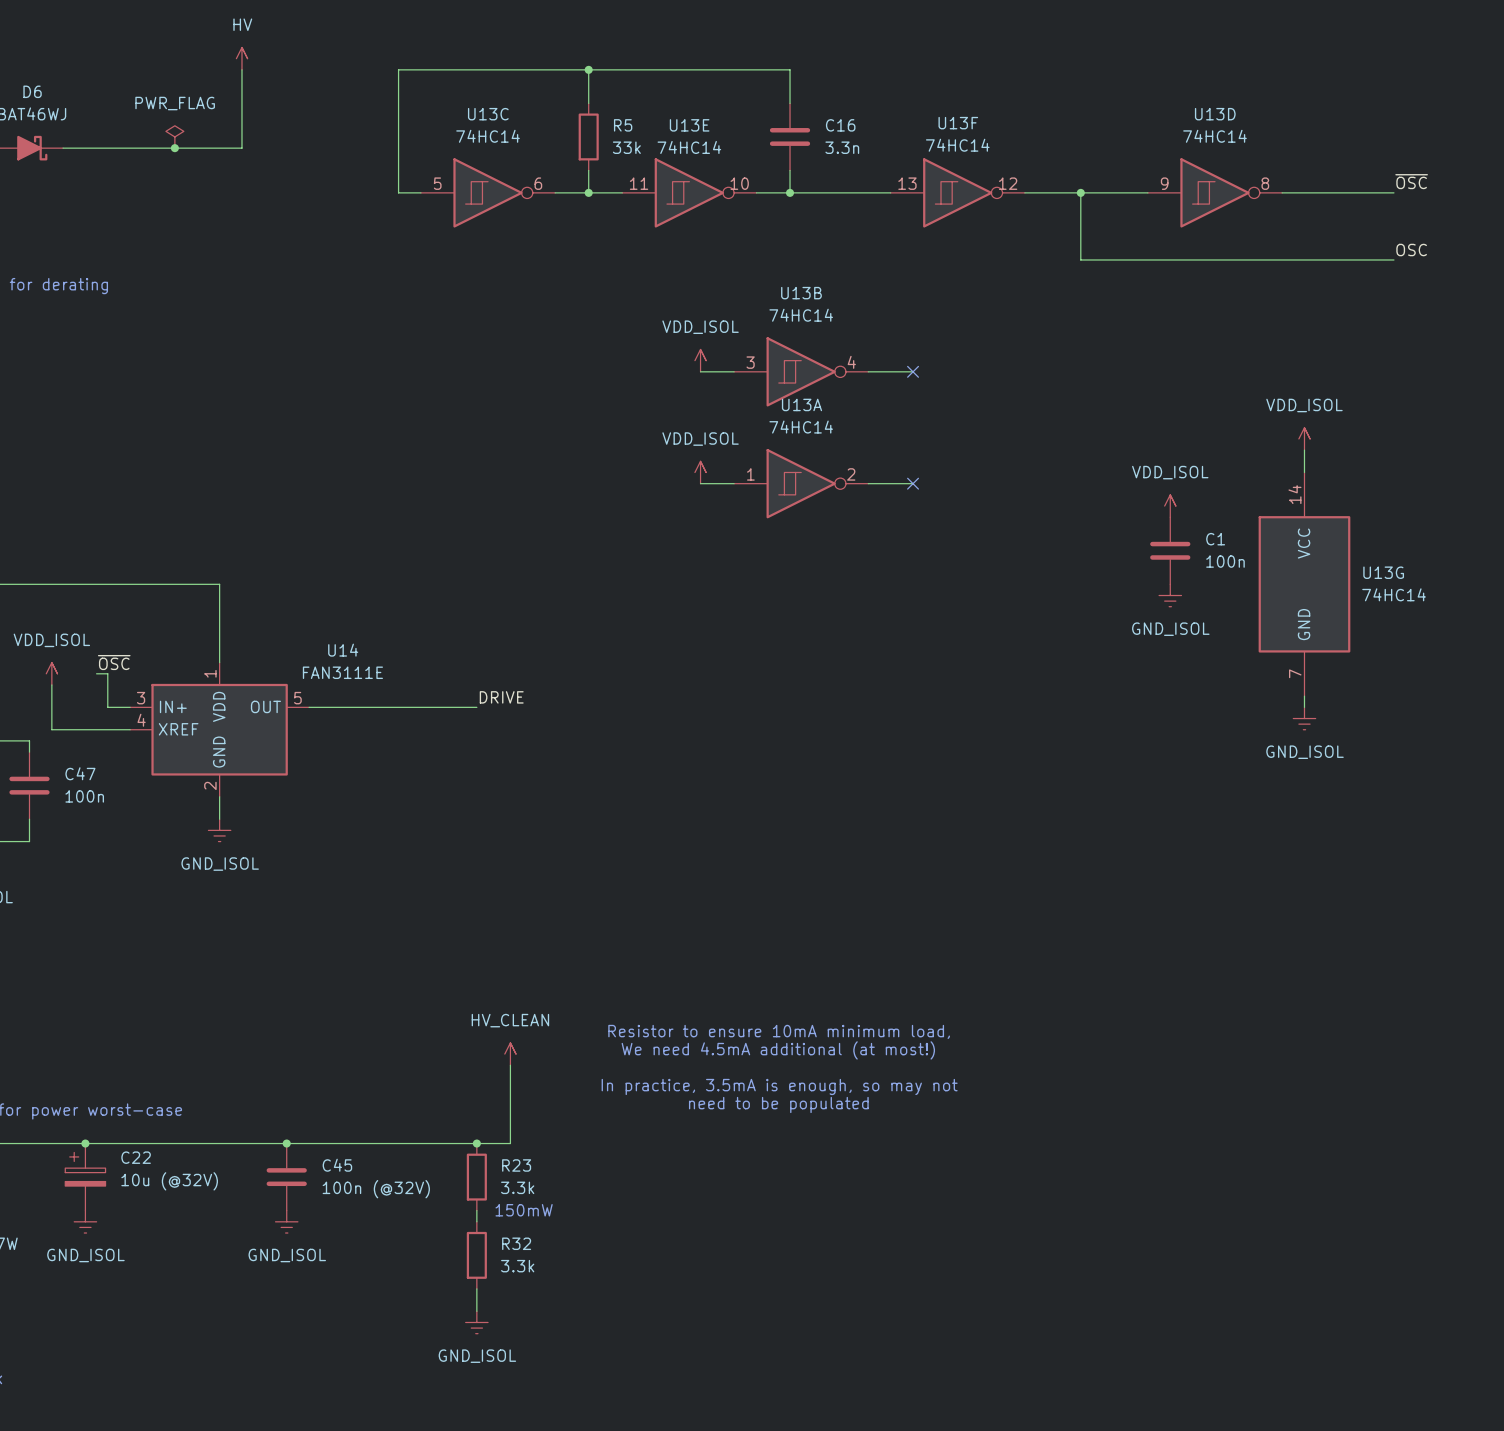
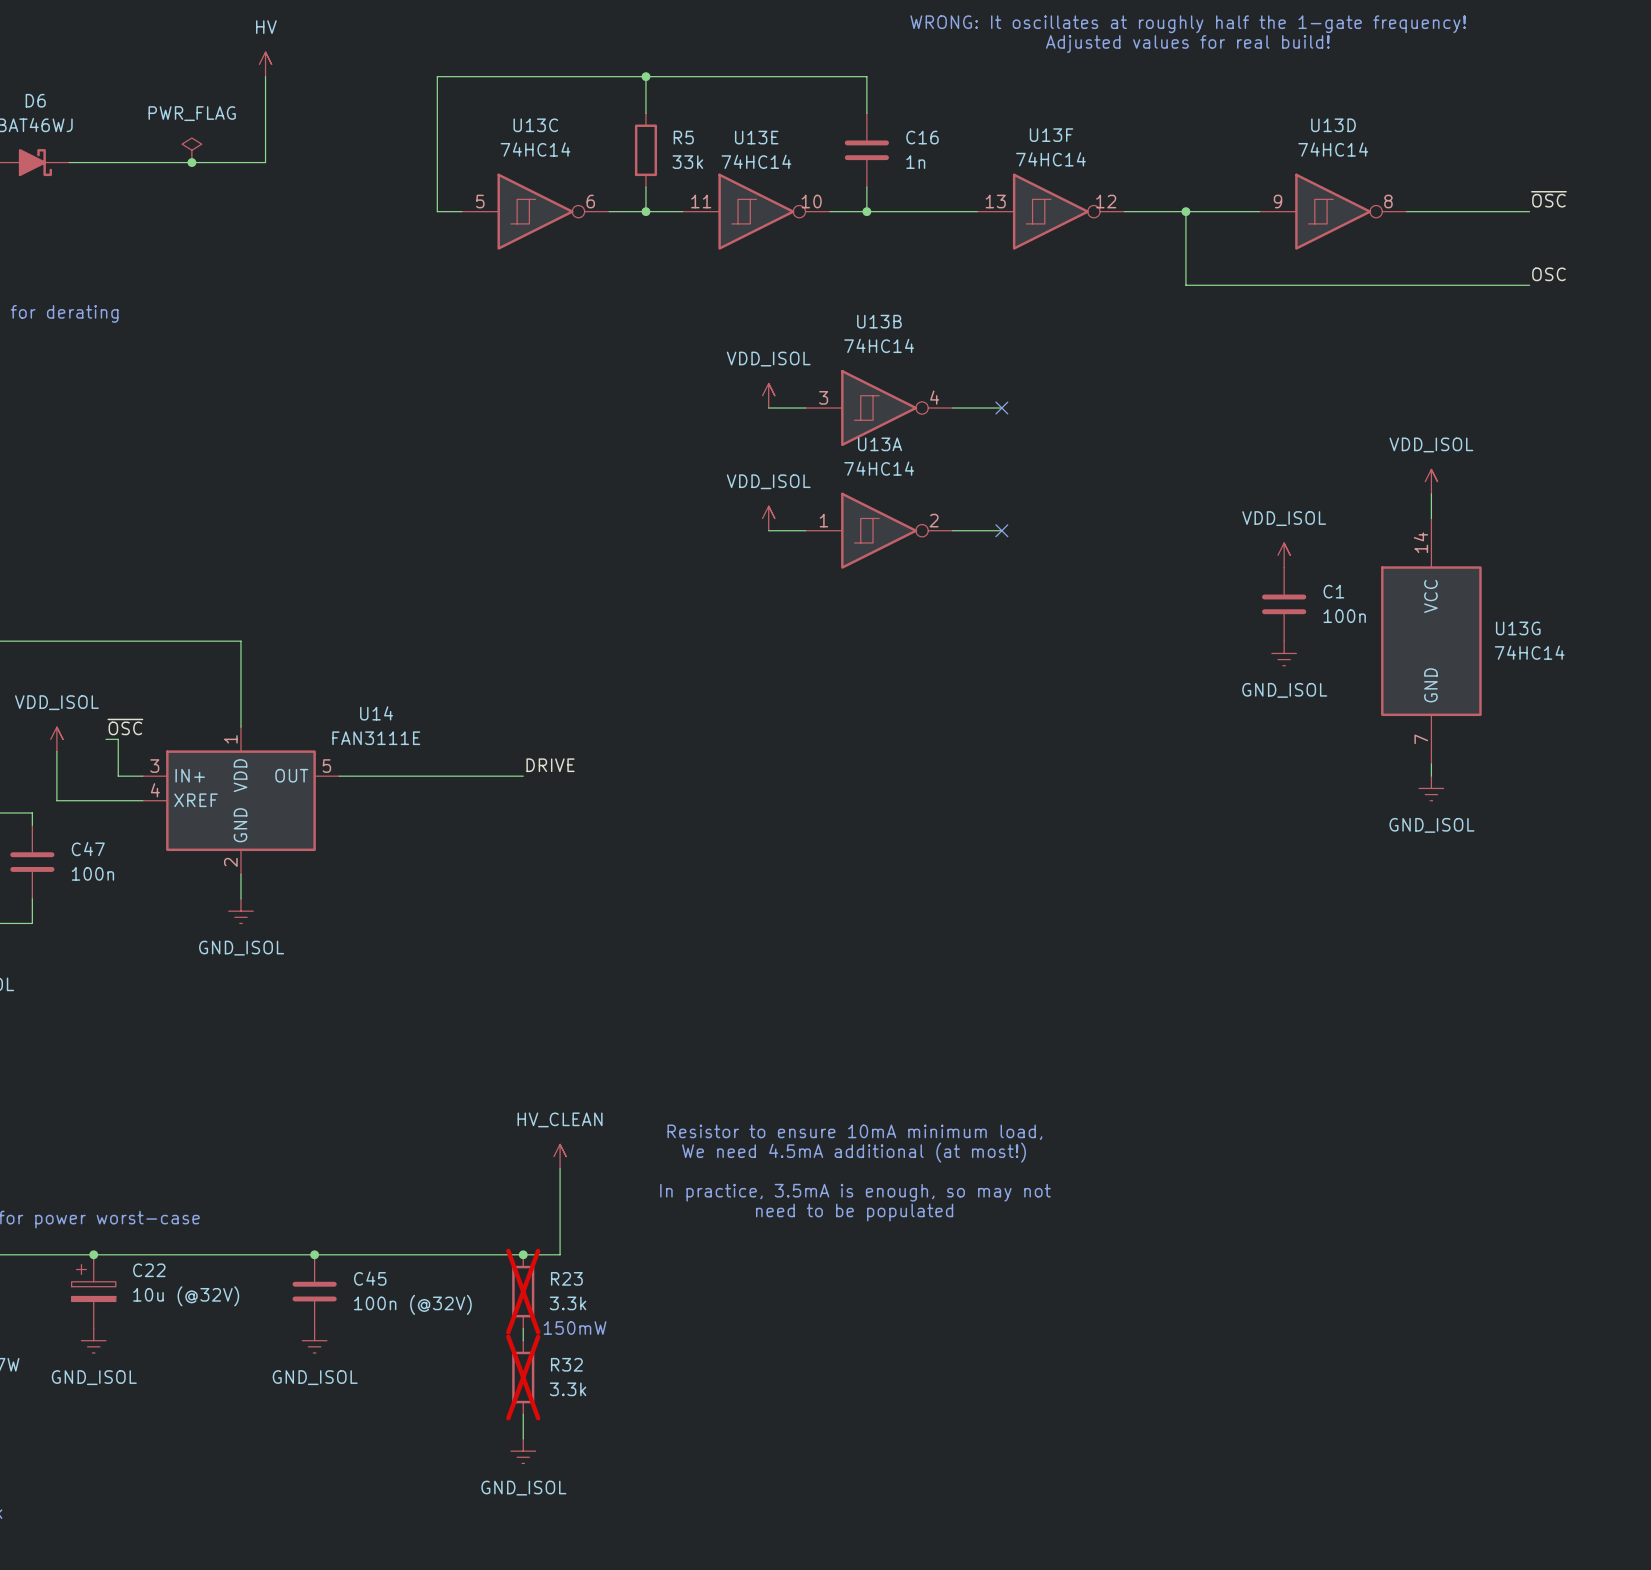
text: none -> WRONG: It oscillates at roughly half the 1-gate frequency! (1188, 24)
text: none -> Adjusted values for real build! (1187, 43)
C16 value: 3.3n (842, 147) -> 1n (915, 162)
R23 do-not-place cross: none -> (523, 1291)
R32 do-not-place cross: none -> (523, 1377)

